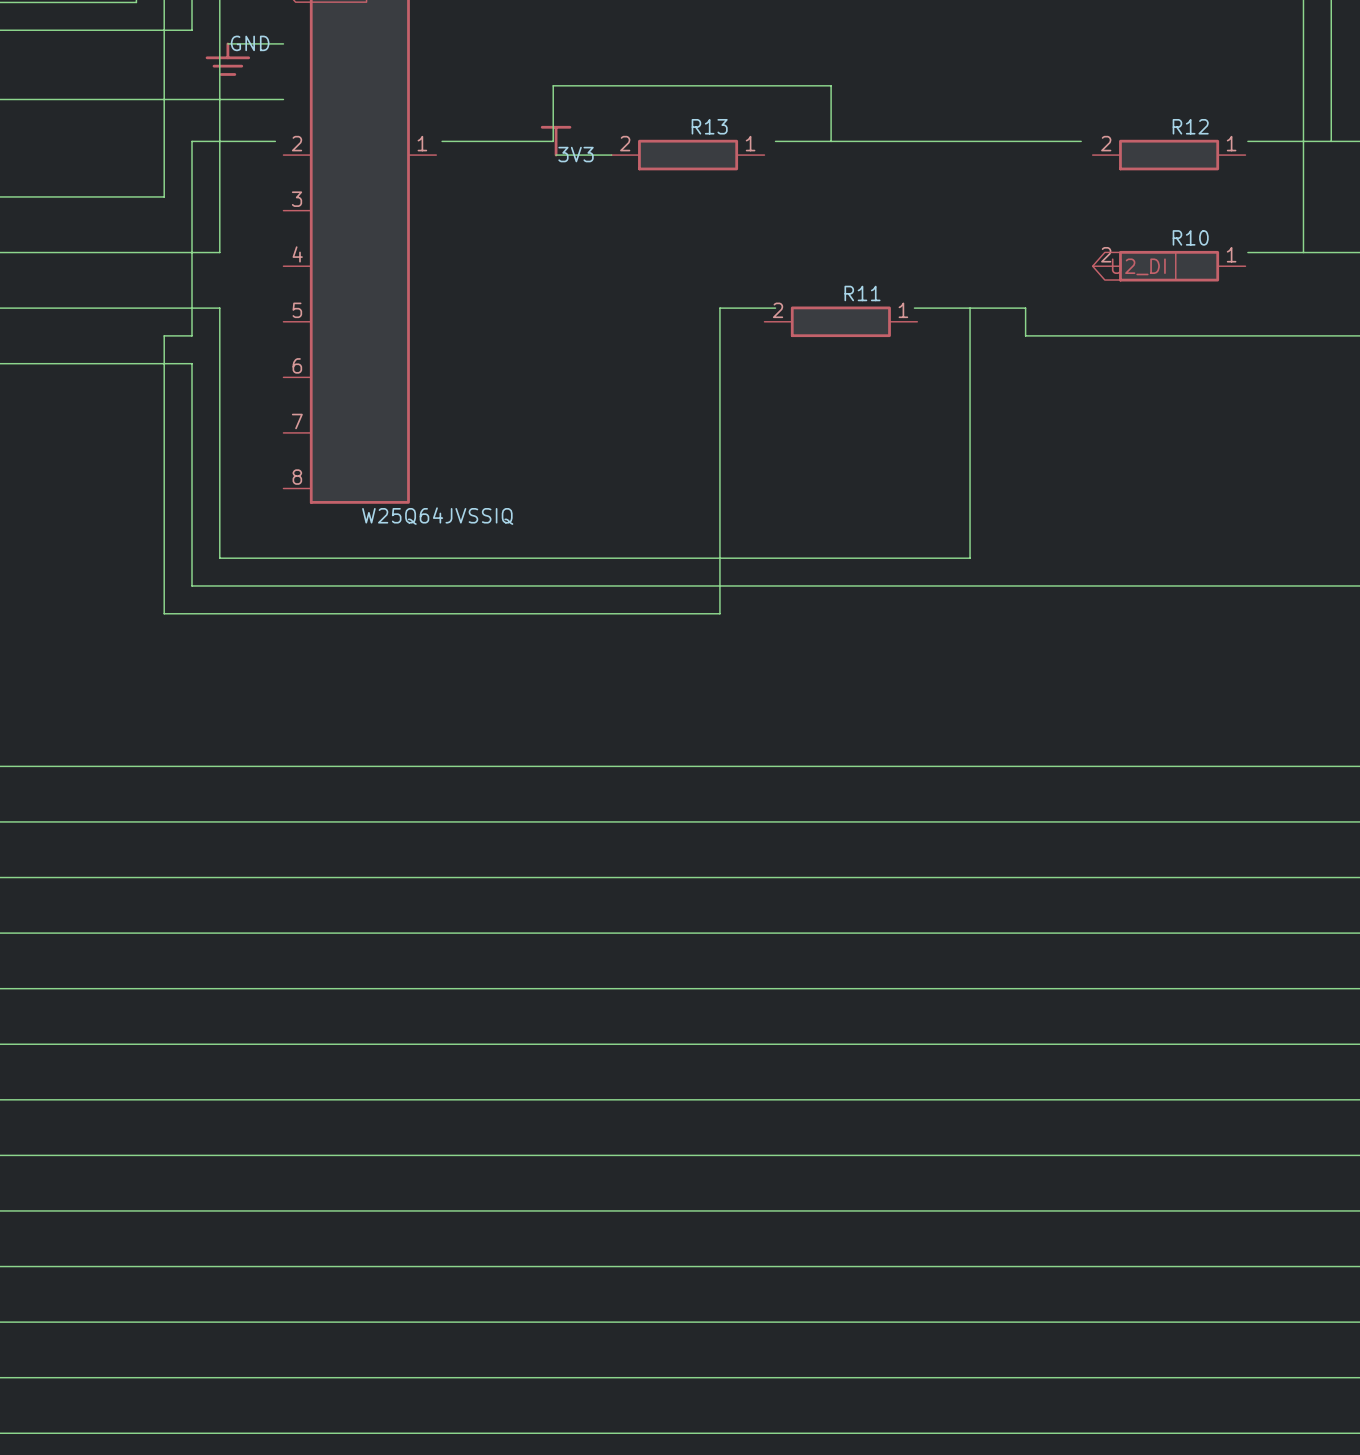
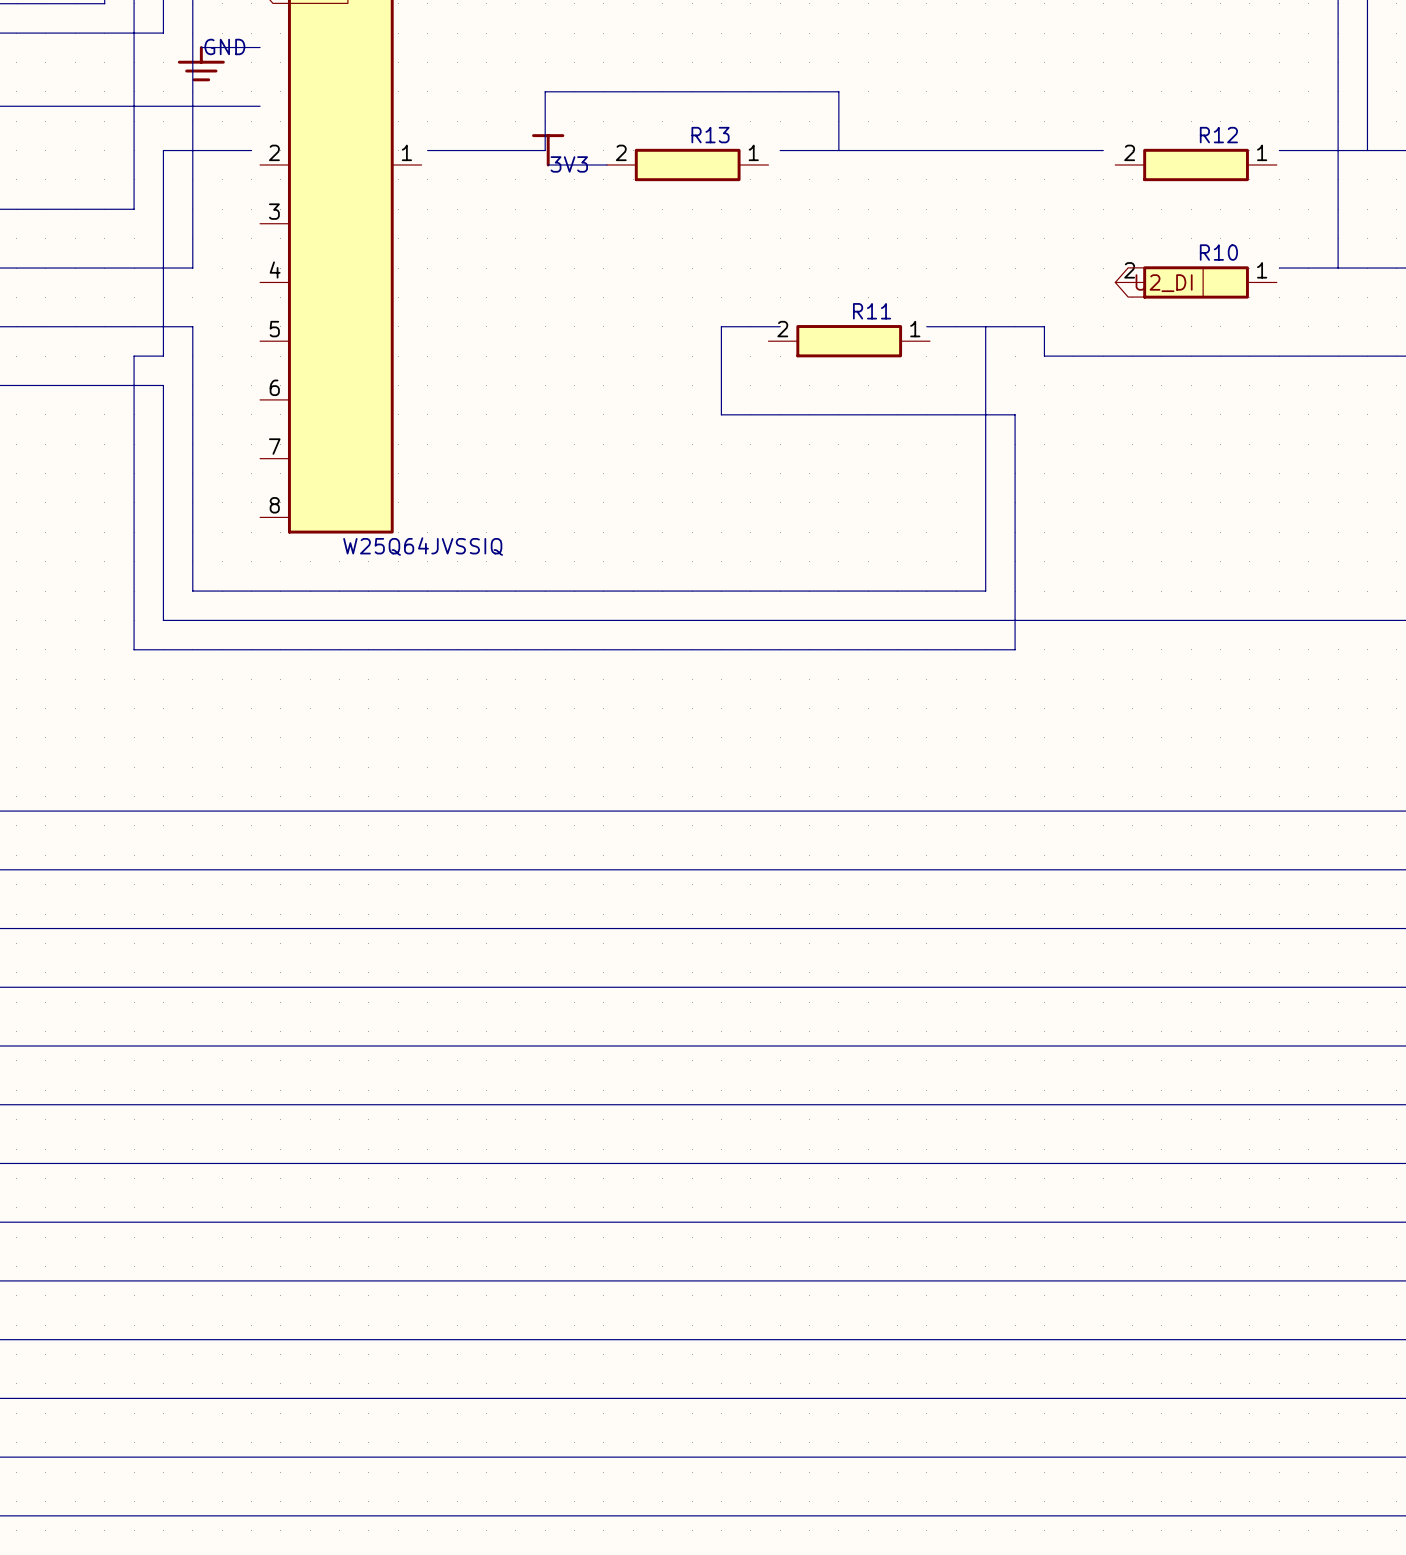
wire: (719, 391) (719, 613) -> (721, 414) (1015, 414) (1015, 649) (721, 649)

